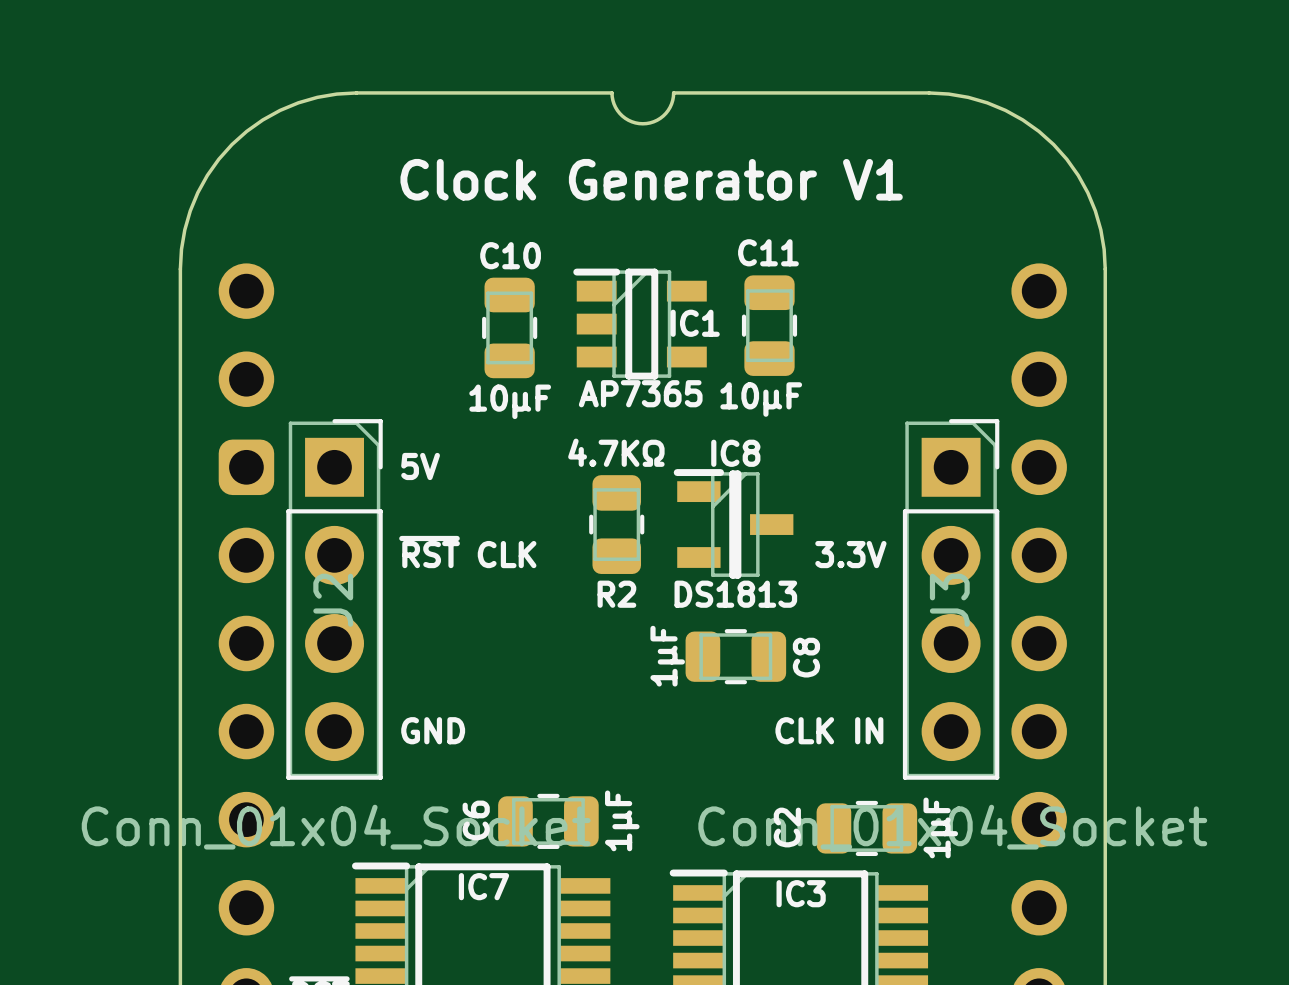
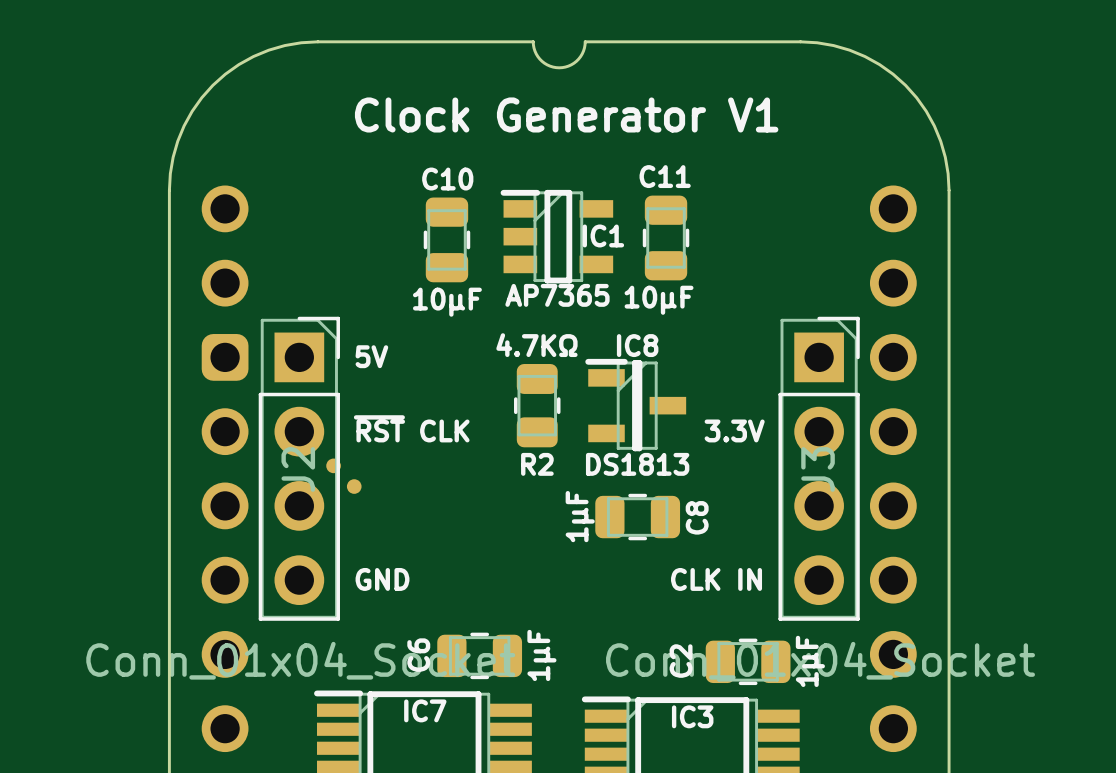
part: none -> (343, 476)

